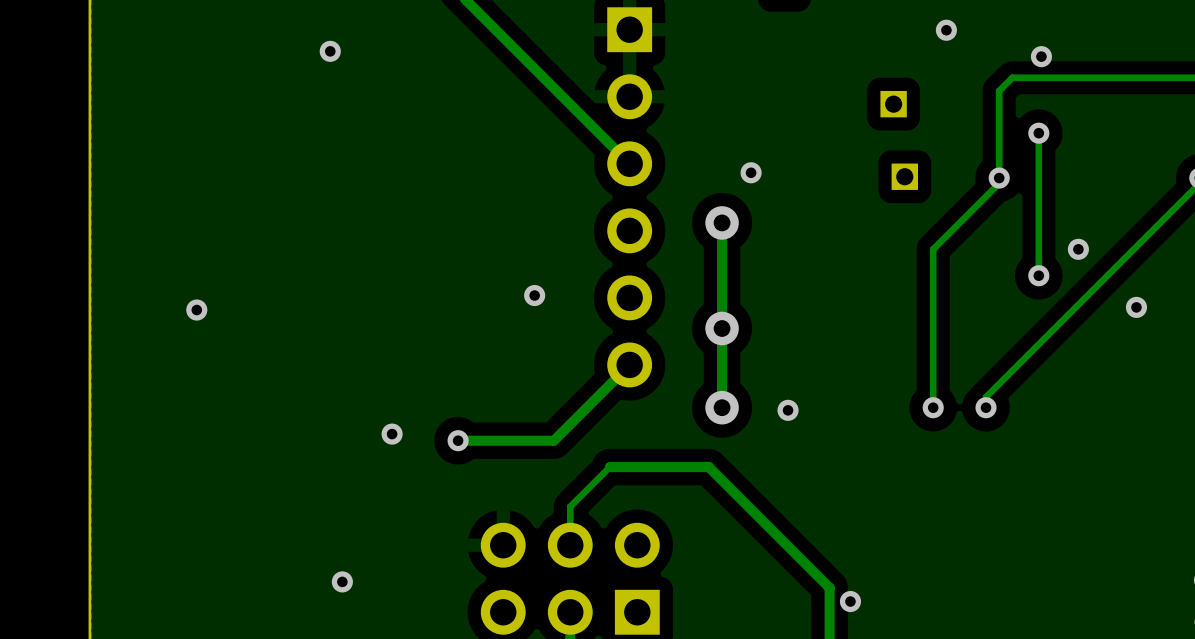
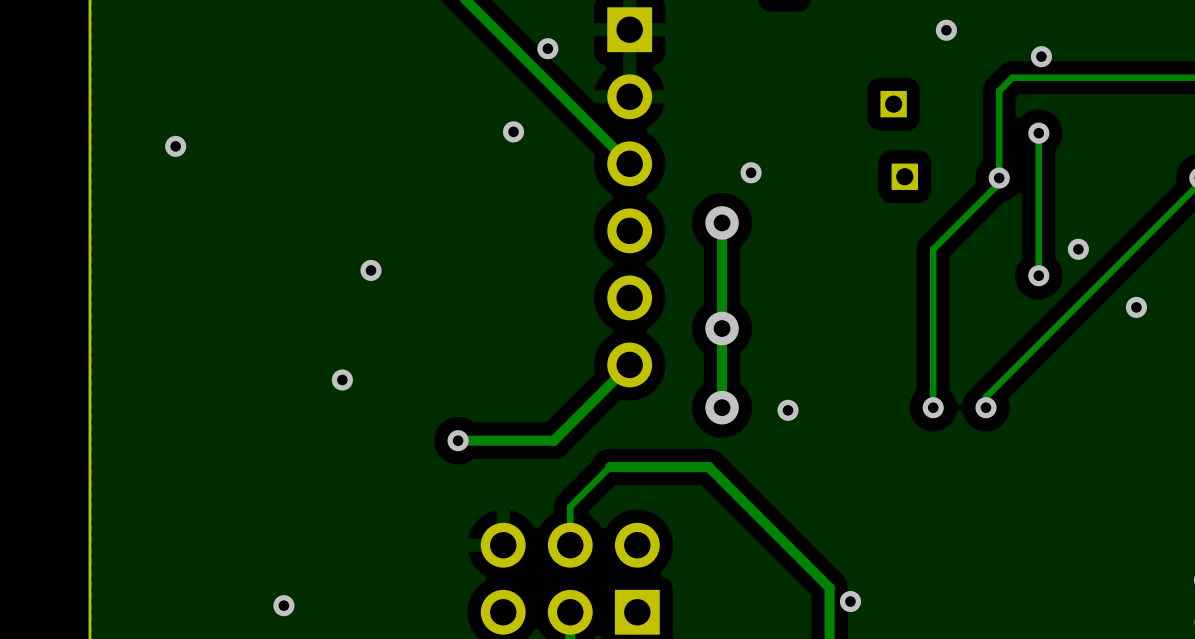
via: none -> (547, 48)
via: (330, 51) -> none
via: none -> (513, 131)
via: none -> (175, 146)
via: none -> (371, 270)
via: (534, 295) -> none
via: (196, 310) -> none
via position: (392, 434) -> (342, 379)
via position: (342, 581) -> (283, 605)

